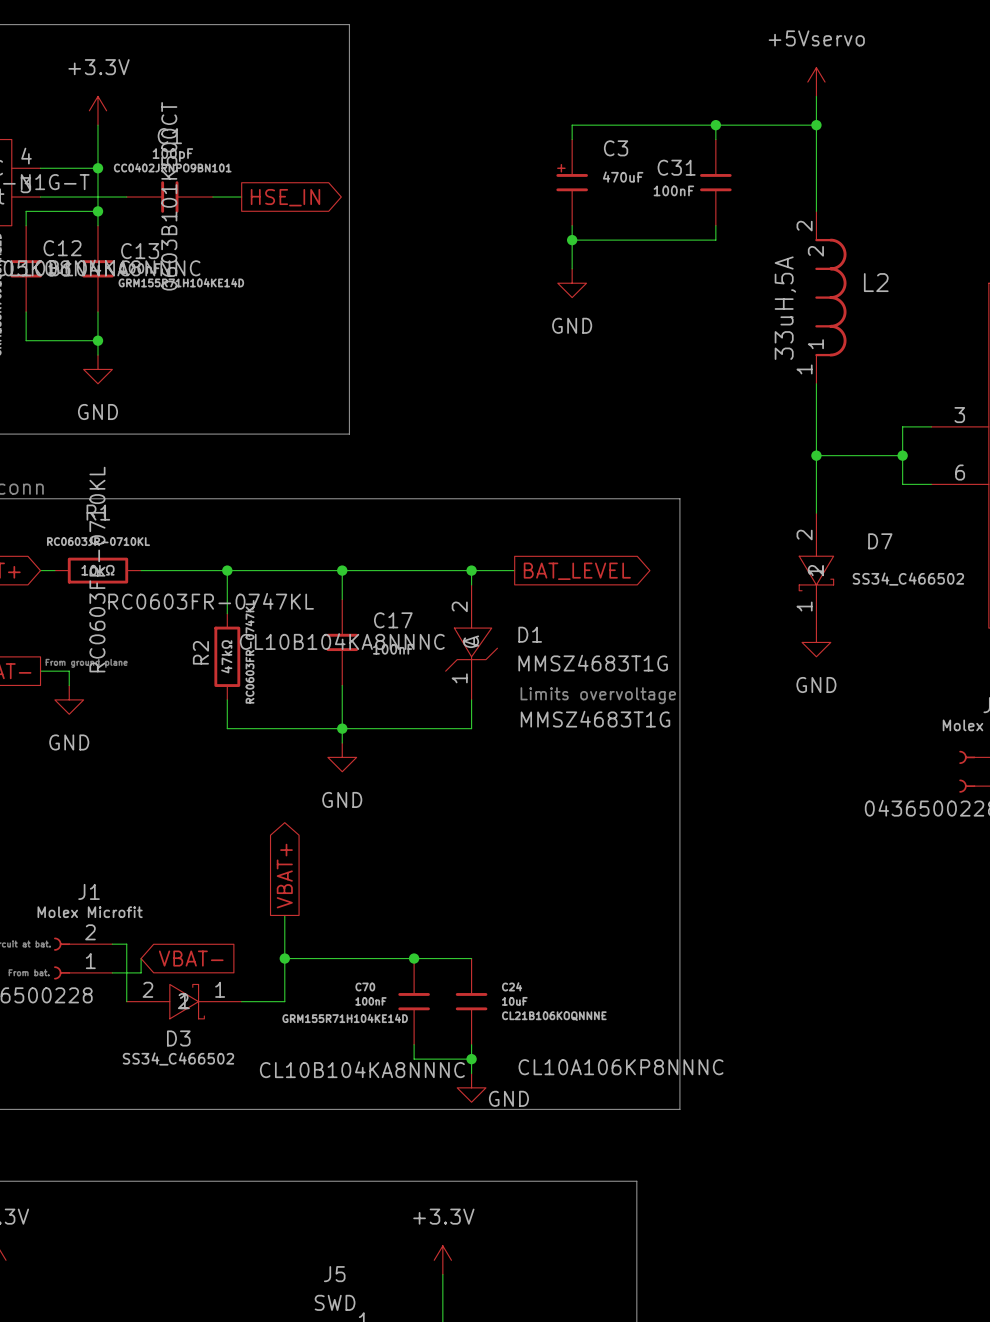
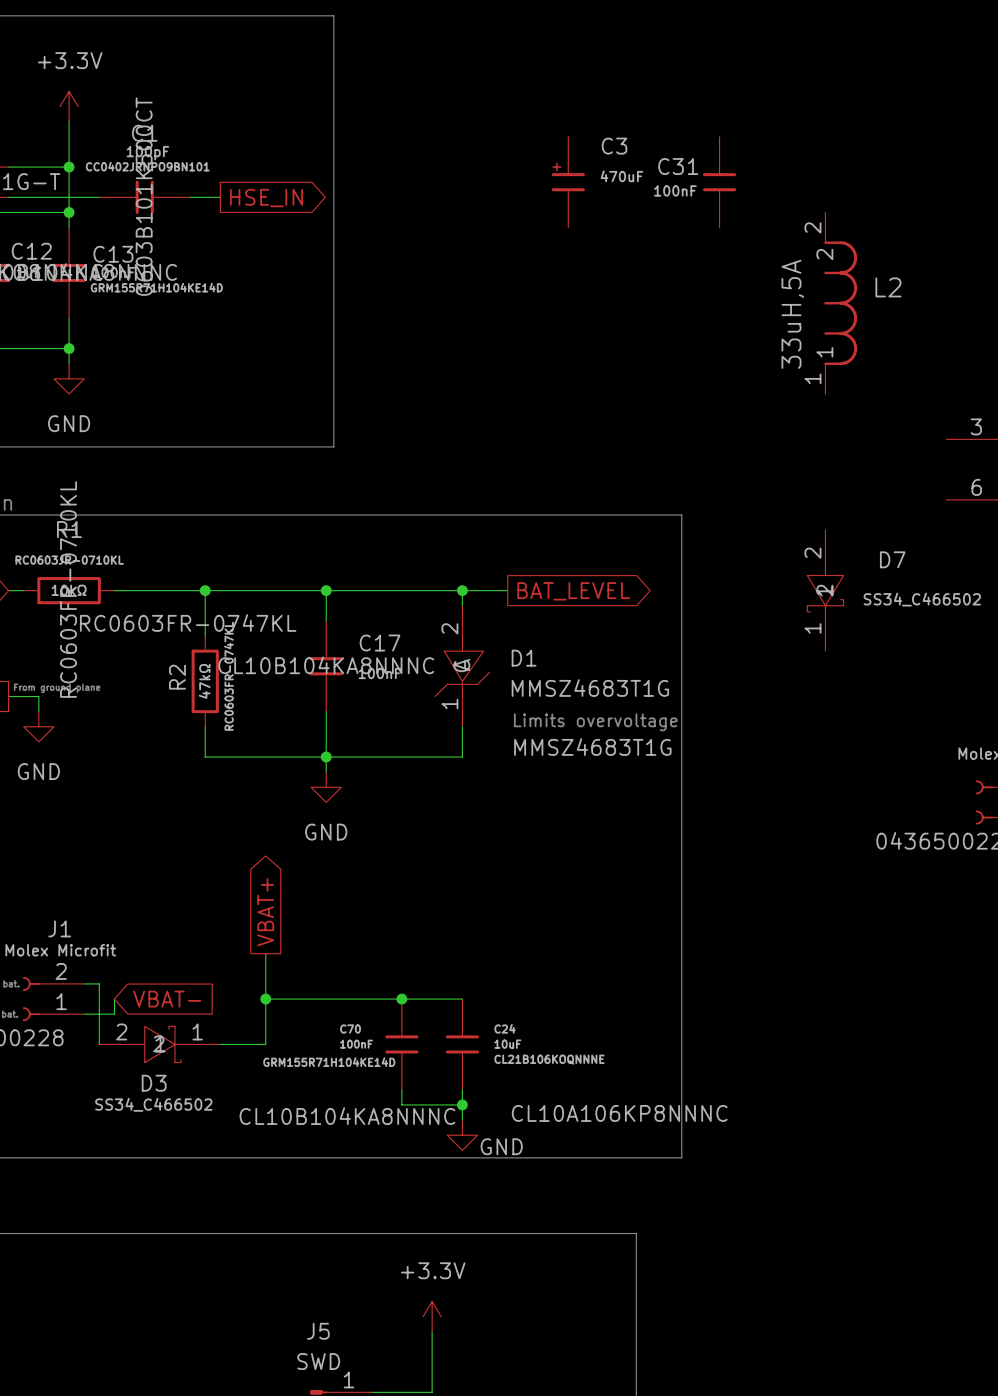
power symbol: +5Vservo (816, 82) -> none
wire: (816, 96) (816, 211) -> none
wire: (715, 125) (715, 139) -> none
junction: (715, 125) -> none
wire: (816, 125) (572, 125) (572, 139) -> none
junction: (816, 125) -> none
wire: (572, 225) (572, 268) -> none
wire: (715, 225) (715, 240) (572, 240) -> none
junction: (572, 240) -> none
power symbol: GND (572, 283) -> none
wire: (816, 383) (816, 513) -> none
wire: (931, 426) (902, 426) (902, 484) (931, 484) -> none
wire: (816, 455) (902, 455) -> none
junction: (816, 455) -> none
junction: (902, 455) -> none
power symbol: GND (816, 642) -> none

